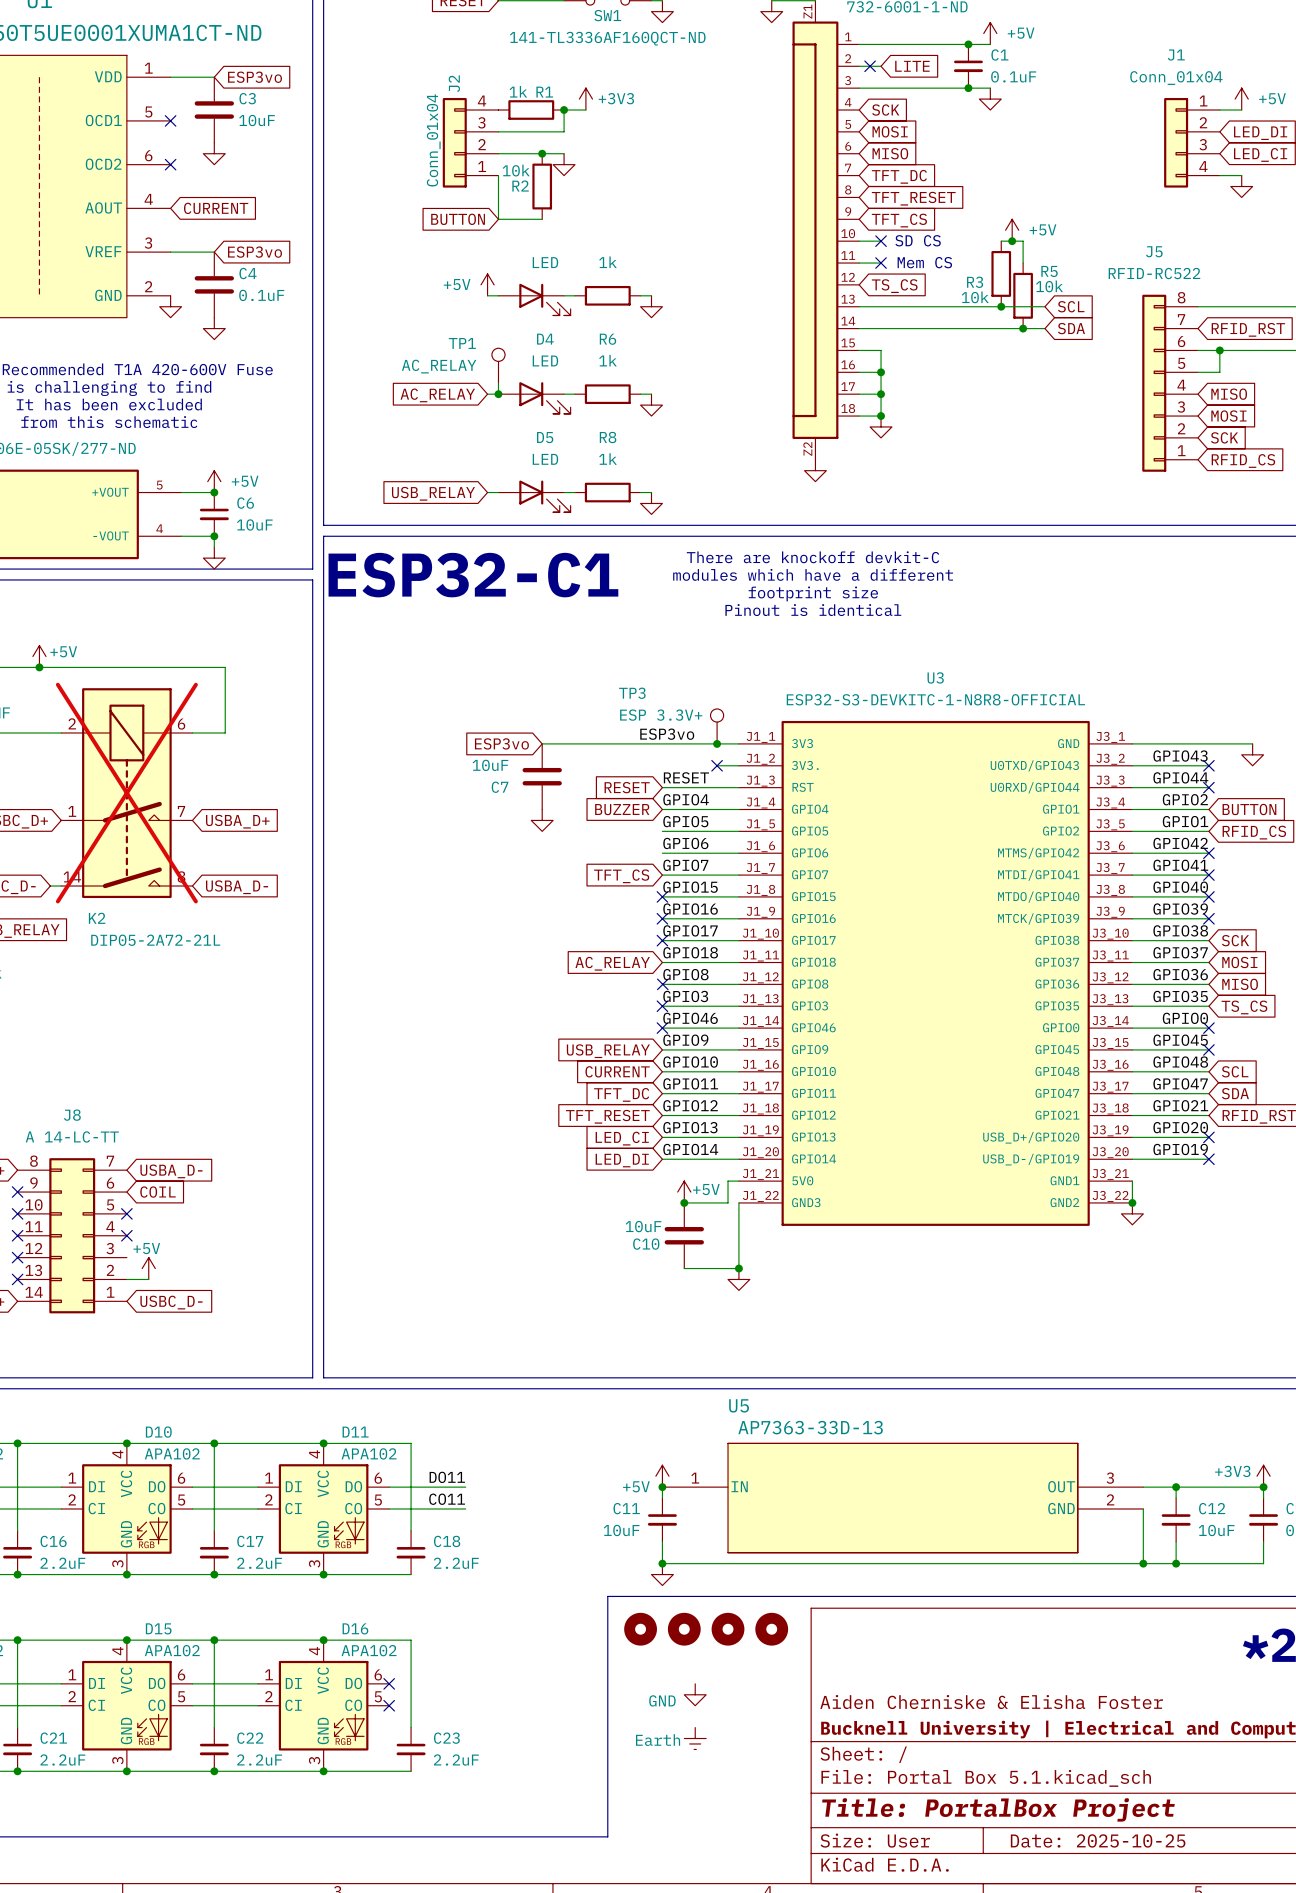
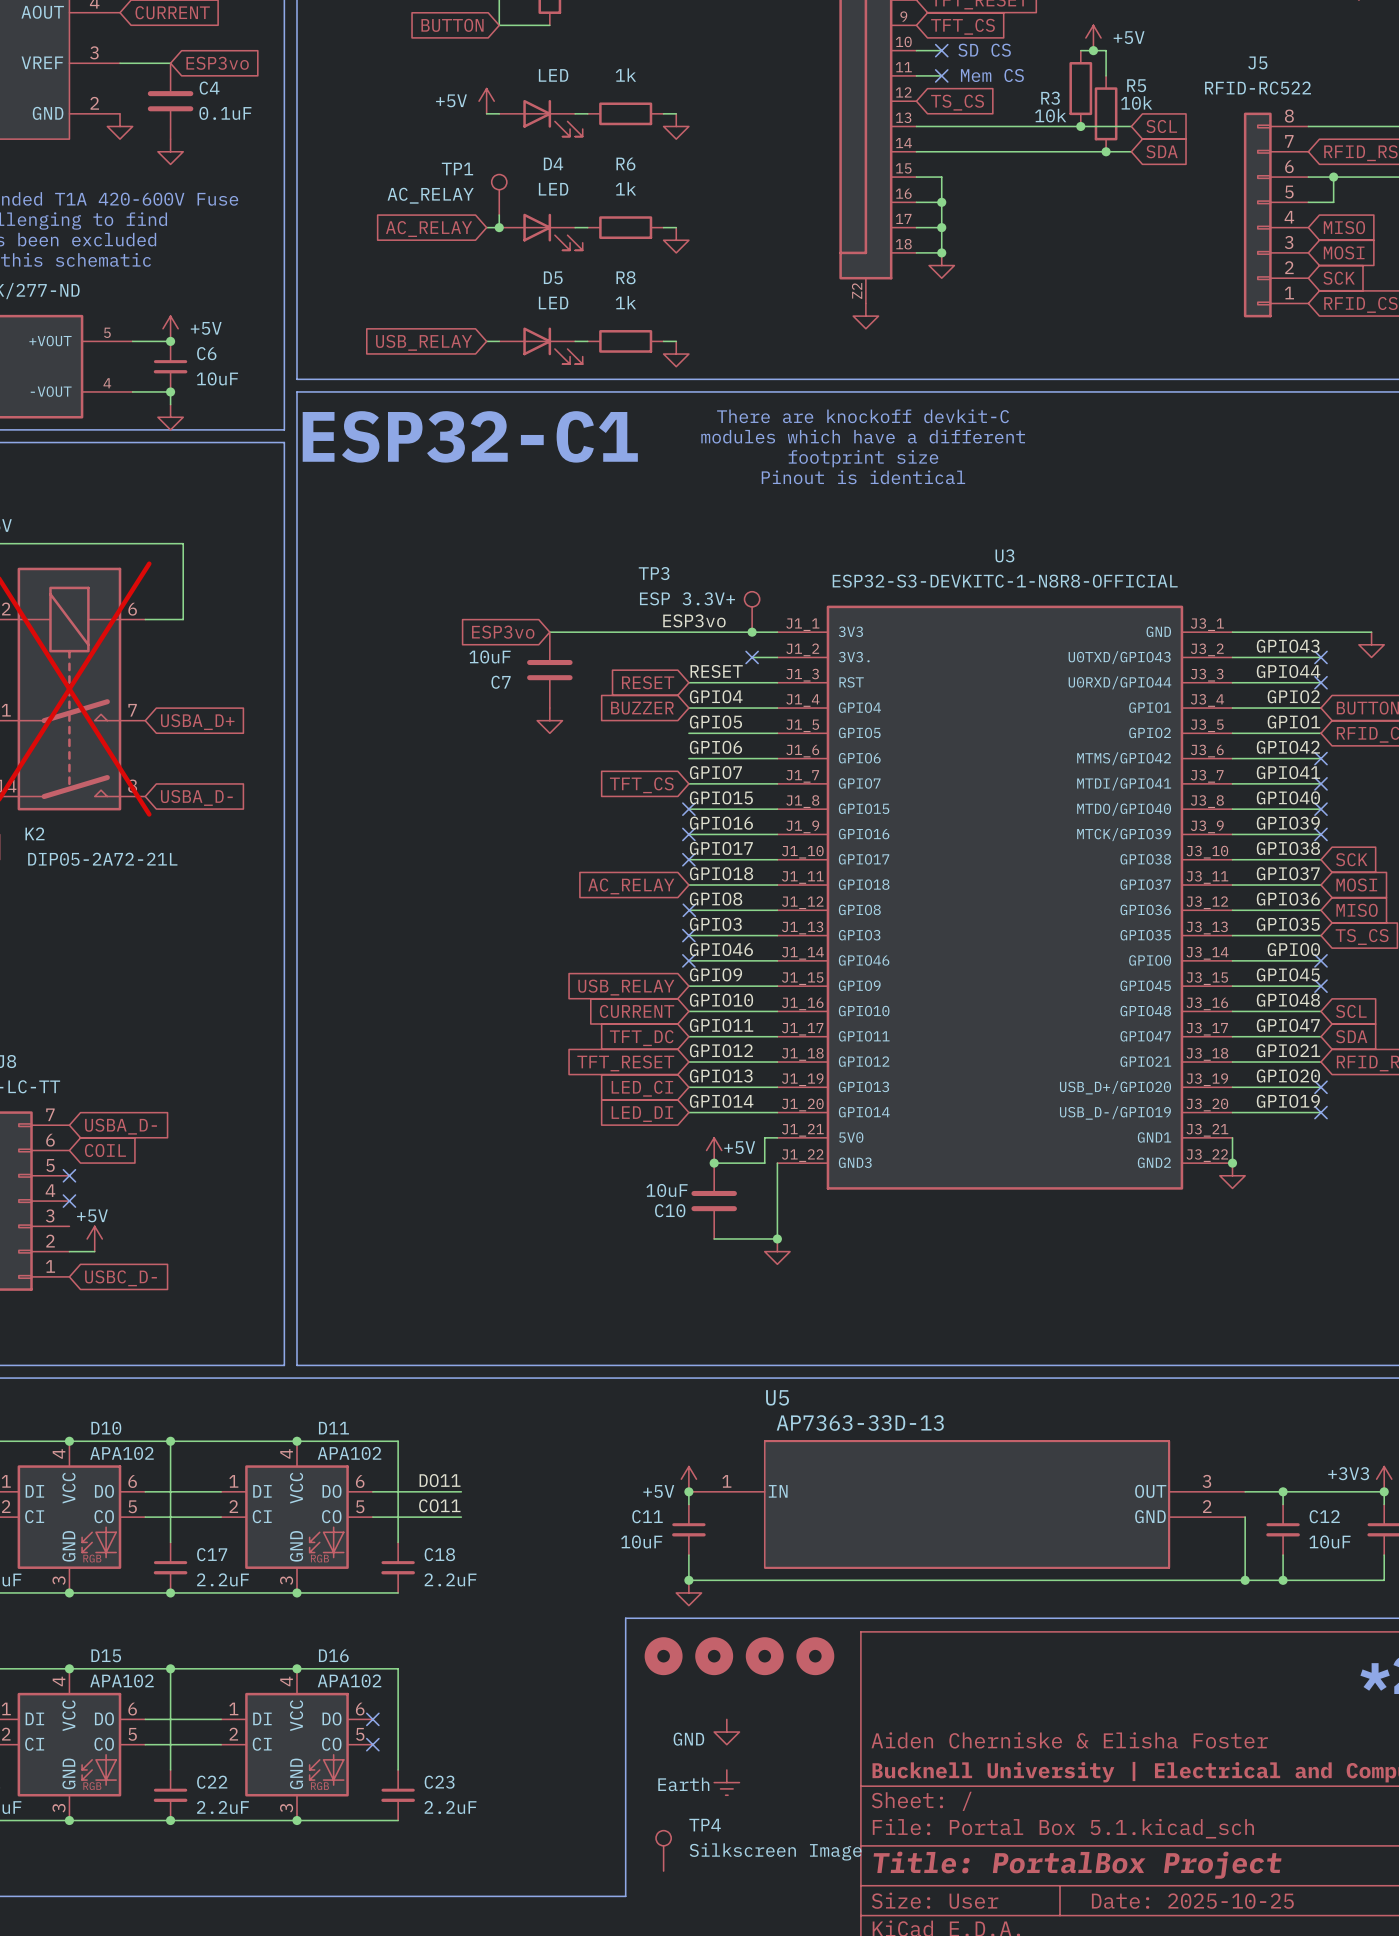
TP4: none -> Silkscreen Image (663, 1850)

